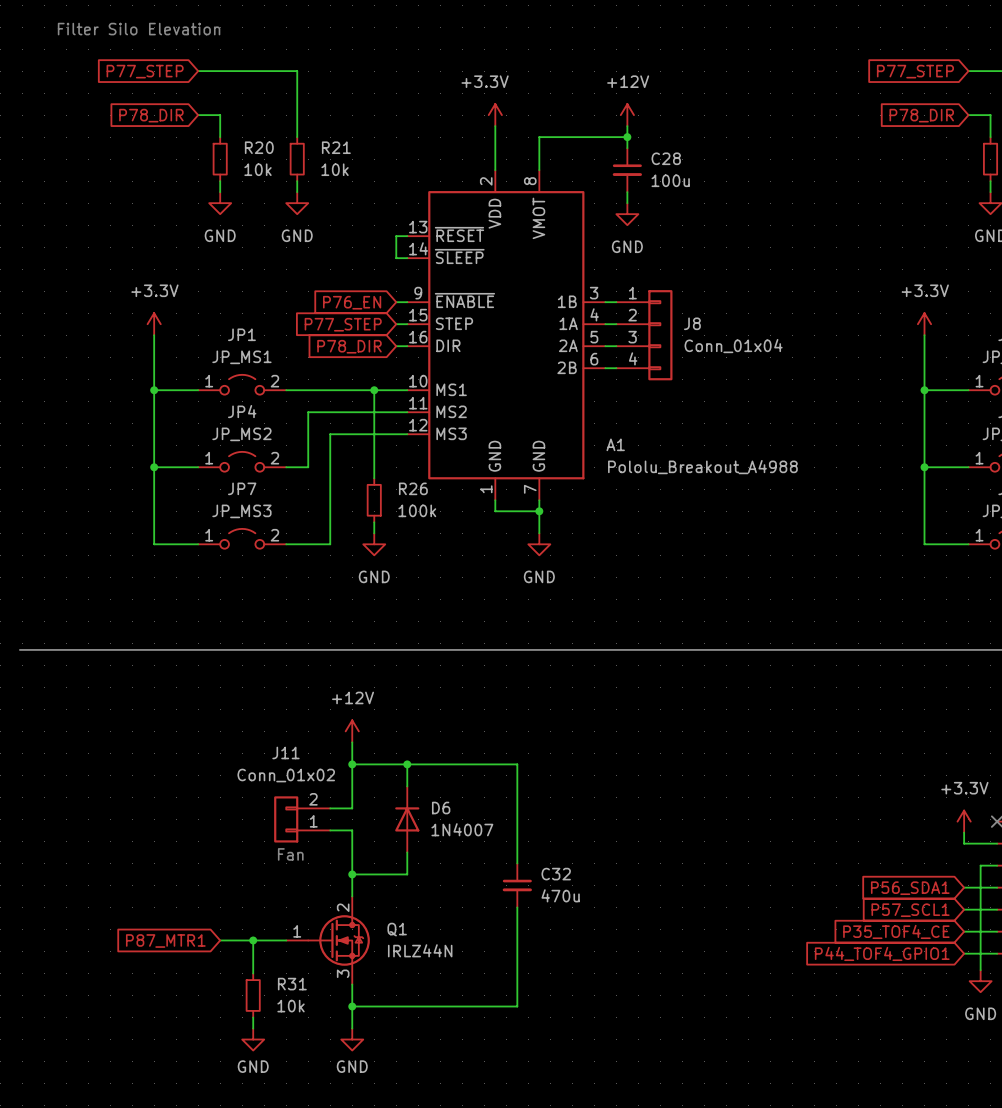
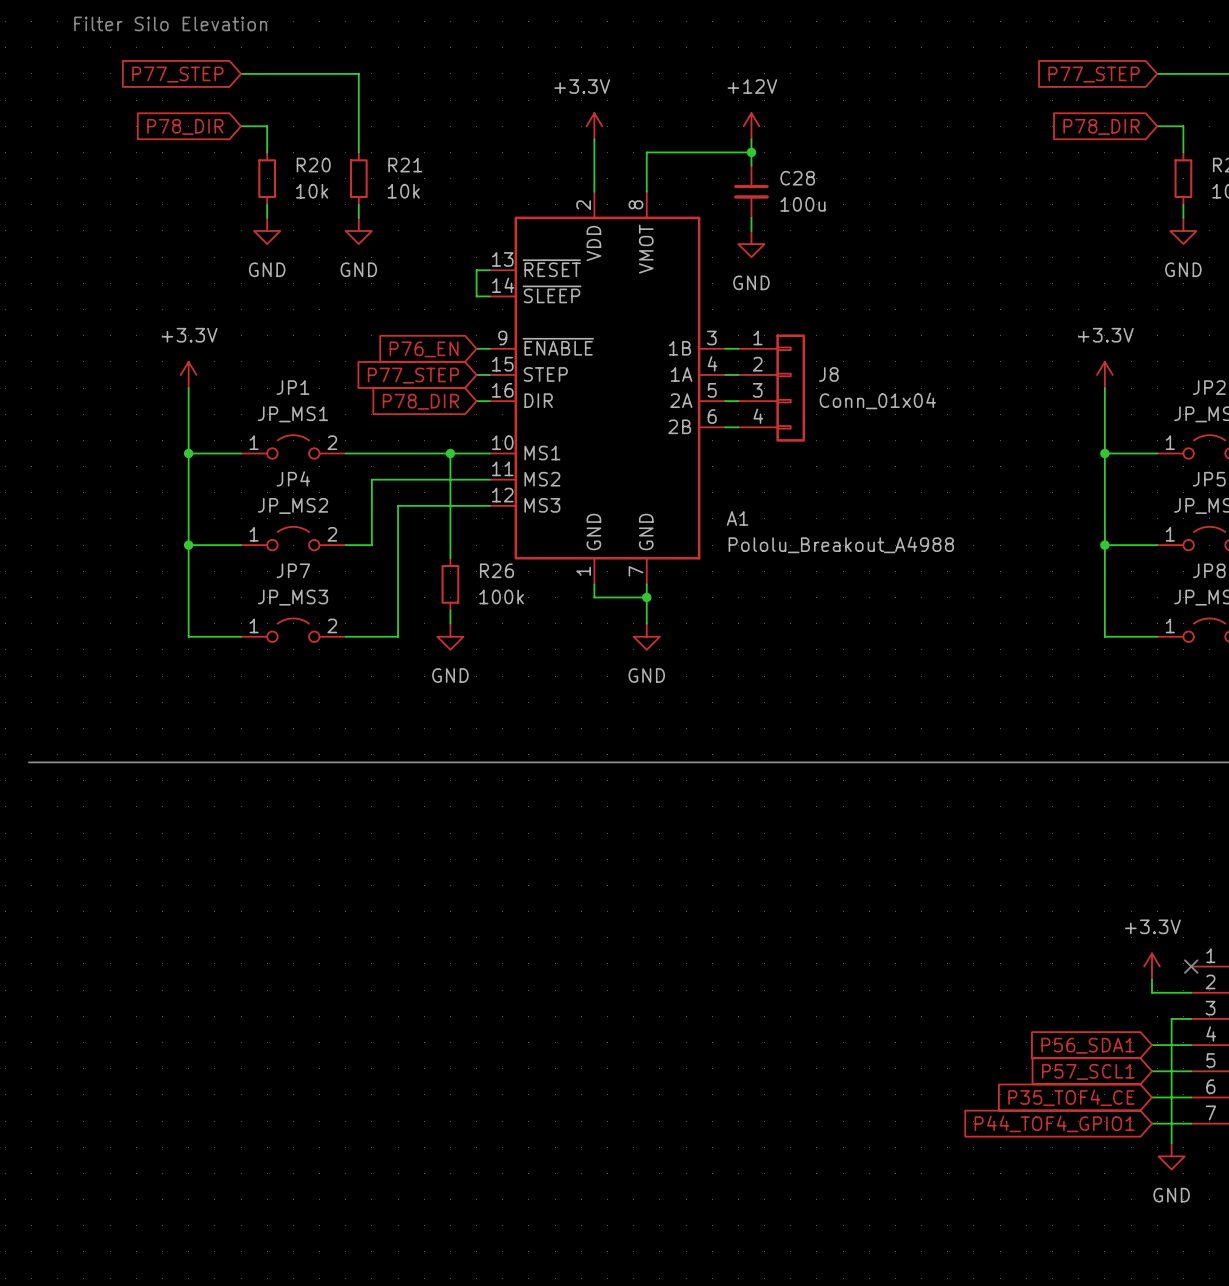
power symbol: +12V (352, 731) -> none
wire: (352, 742) (352, 808) (330, 808) -> none
wire: (352, 764) (517, 764) (517, 863) -> none
junction: (352, 764) -> none
wire: (407, 764) (407, 786) -> none
junction: (407, 764) -> none
J11: Conn_01x02 (302, 819) -> none
D6: 1N4007 (407, 819) -> none
wire: (330, 830) (352, 830) (352, 896) -> none
wire: (407, 852) (407, 874) (352, 874) -> none
text: Fan (290, 854) -> none
junction: (352, 874) -> none
C32: 470u (517, 885) -> none
wire: (517, 907) (517, 1006) (352, 1006) -> none
wire: (220, 940) (286, 940) -> none
wire: (253, 940) (253, 973) -> none
junction: (253, 940) -> none
Q1: IRLZ44N (328, 940) -> none
global label: P87_MTR1 (165, 941) -> none
wire: (352, 984) (352, 1028) -> none
R31: 10k (253, 995) -> none
junction: (352, 1006) -> none
wire: (253, 1017) (253, 1028) -> none
power symbol: GND (253, 1039) -> none
power symbol: GND (352, 1039) -> none

